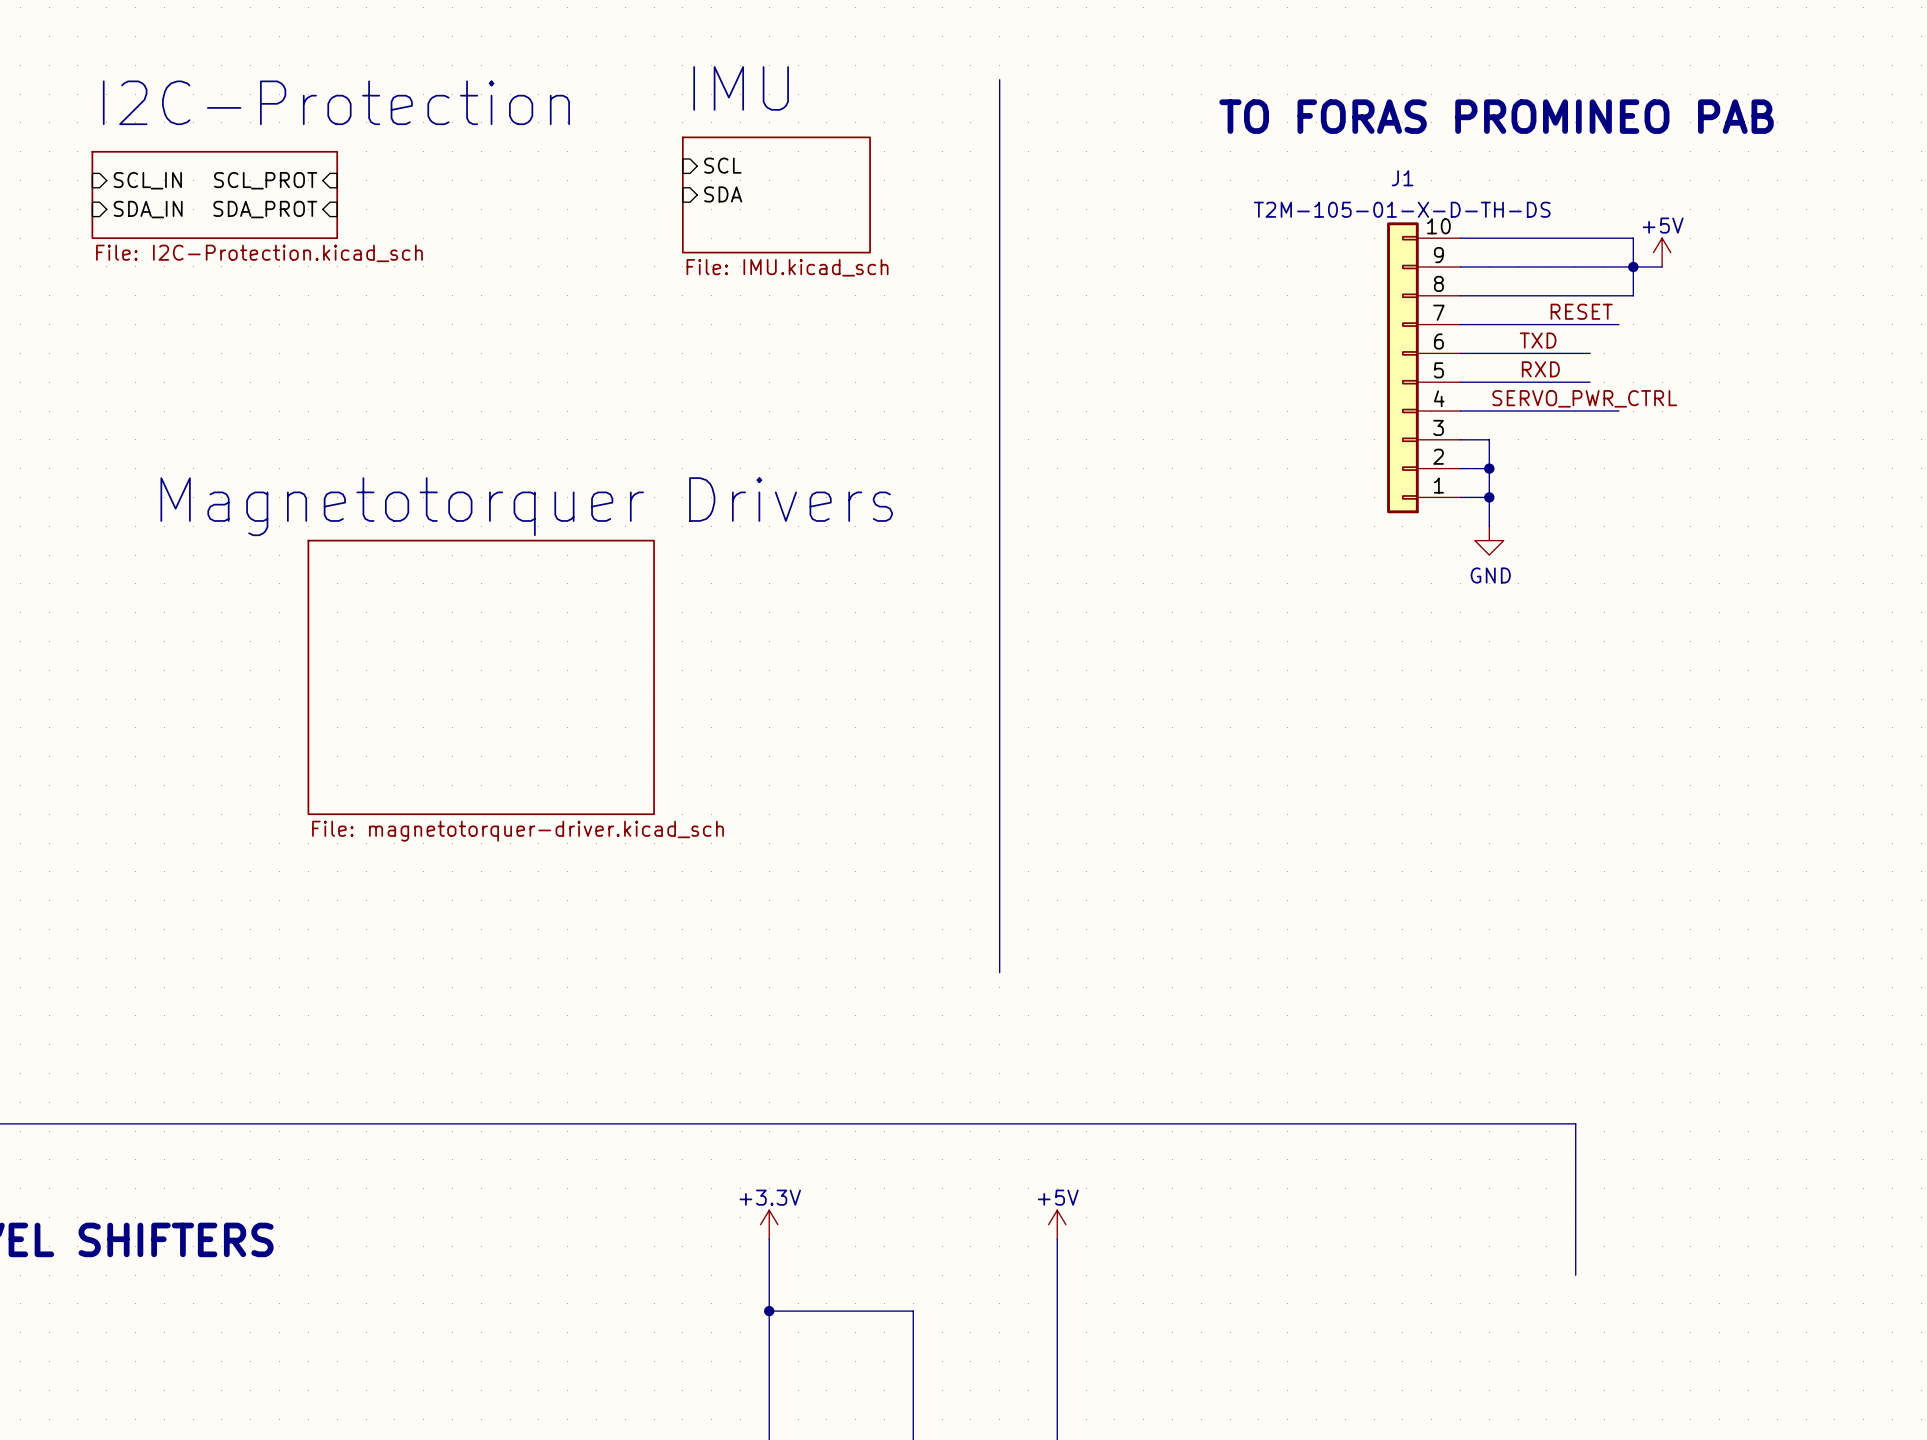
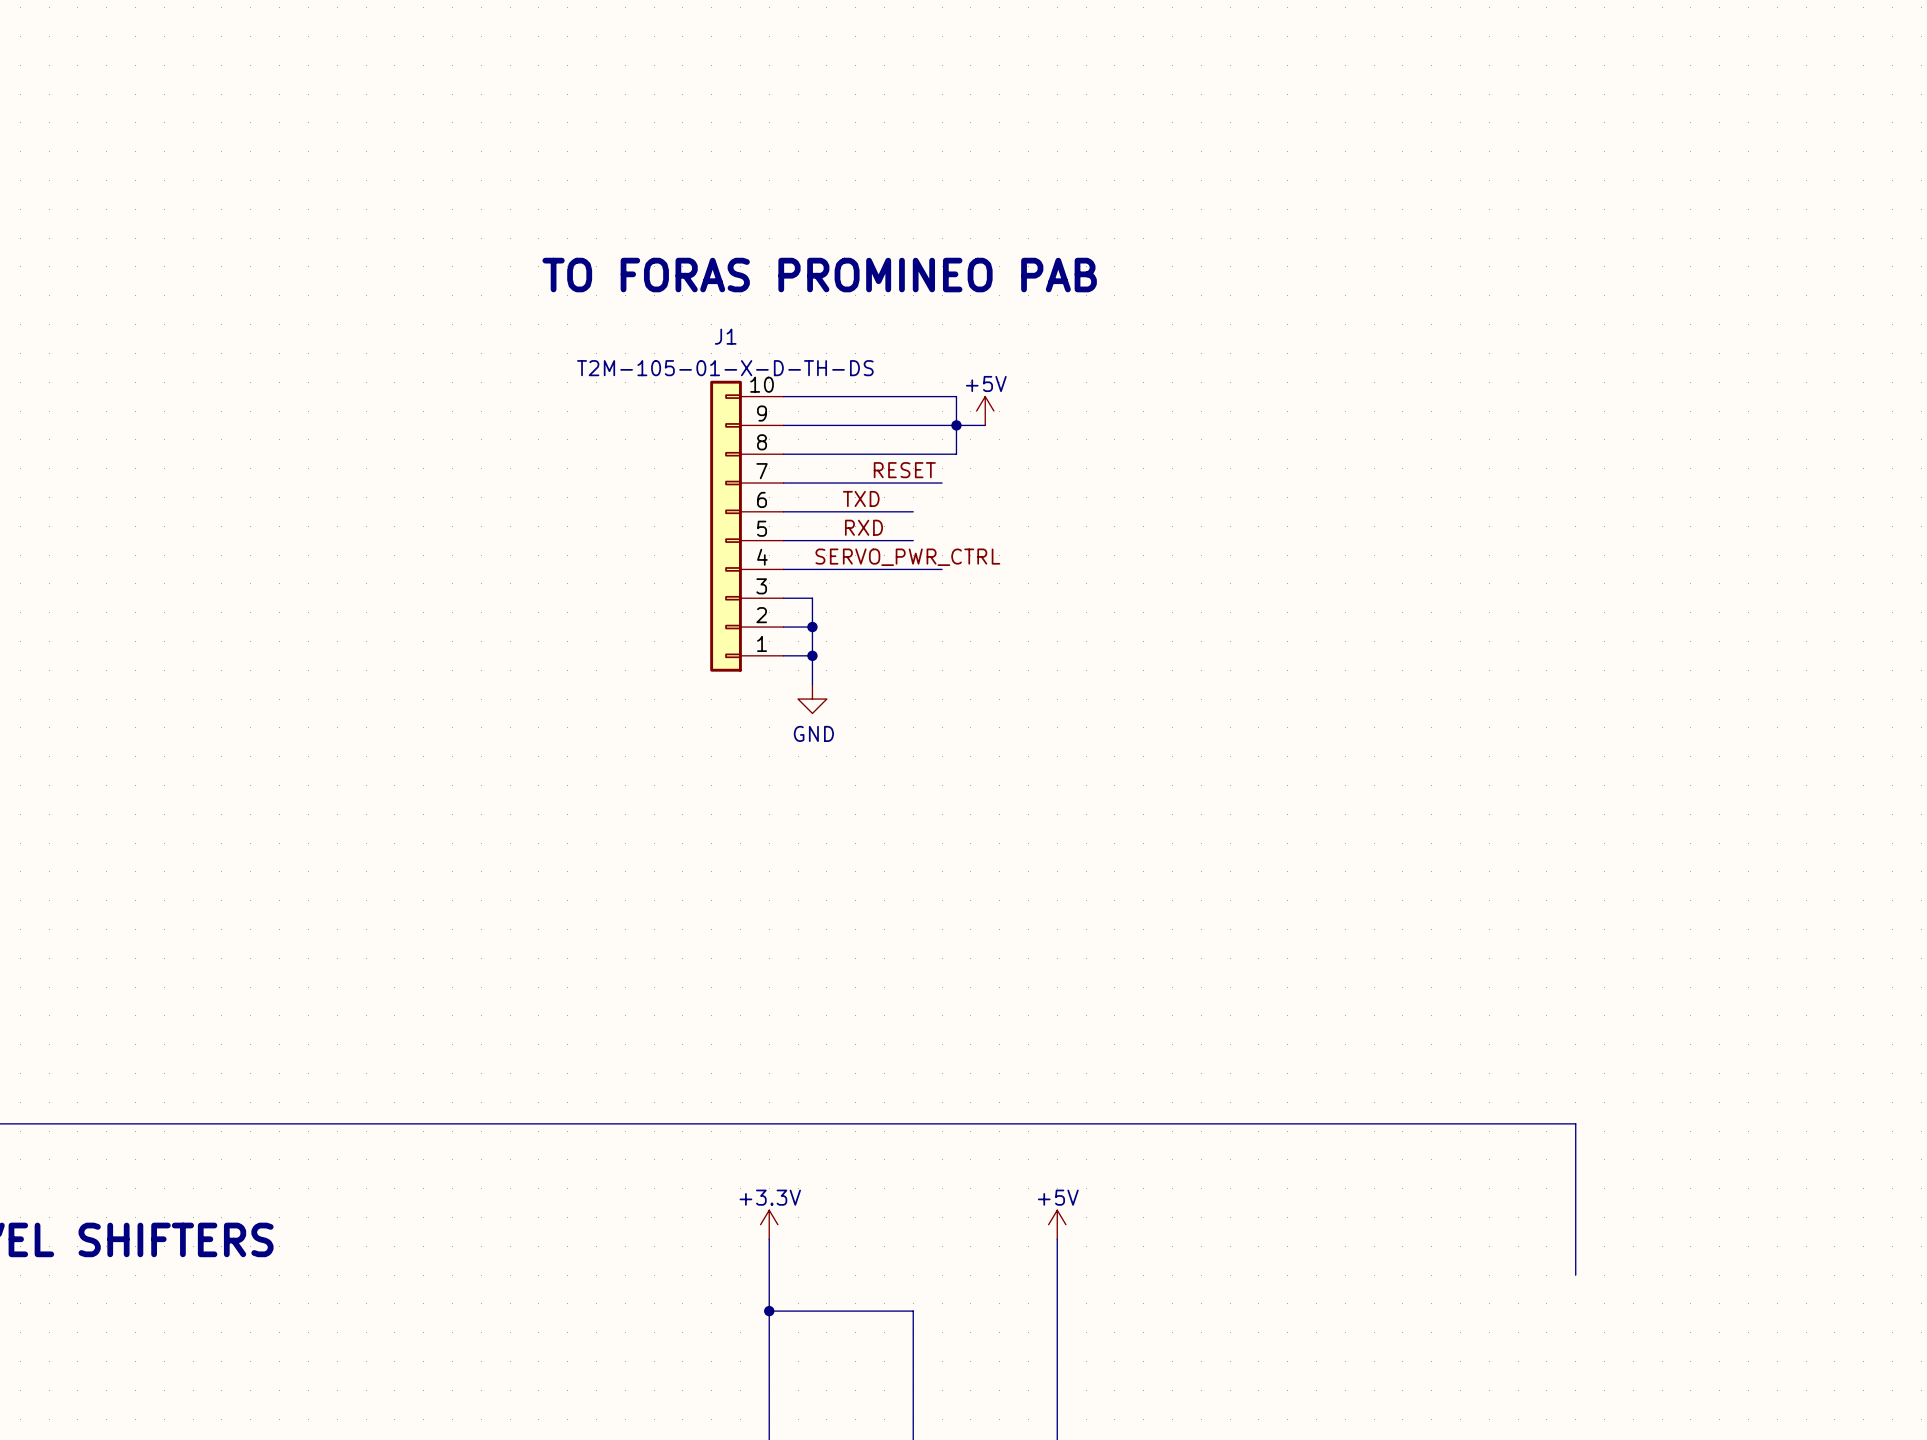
line: (999, 79) (999, 972) -> none
text: TO FORAS PROMINEO PAB (1496, 116) -> none
sheet pin: SCL (722, 165) -> none
sheet pin: SCL_IN (147, 180) -> none
sheet pin: SCL_PROT (265, 180) -> none
sheet I2C-Protection: File: I2C-Protection.kicad_sch (214, 194) -> none
sheet pin: SDA (723, 194) -> none
sheet IMU: File: IMU.kicad_sch (776, 194) -> none
sheet pin: SDA_IN (148, 209) -> none
sheet pin: SDA_PROT (265, 209) -> none
wire: (1460, 238) (1633, 238) (1633, 295) (1460, 295) -> none
power symbol: +5V (1662, 252) -> none
wire: (1460, 266) (1662, 266) -> none
junction: (1633, 266) -> none
text: none -> TO FORAS PROMINEO PAB (819, 275)
label: RESET (1581, 311) -> none
wire: (1460, 324) (1618, 324) -> none
label: TXD (1538, 340) -> none
wire: (1460, 353) (1590, 353) -> none
J1 position: (1423, 367) -> (746, 526)
label: RXD (1540, 369) -> none
wire: (1460, 382) (1590, 382) -> none
wire: none -> (783, 396) (956, 396) (956, 454) (783, 454)
label: SERVO_PWR_CTRL (1584, 398) -> none
power symbol: none -> +5V (985, 411)
wire: (1460, 411) (1618, 411) -> none
wire: none -> (783, 425) (985, 425)
junction: none -> (956, 425)
wire: (1460, 439) (1489, 439) (1489, 526) -> none
wire: (1460, 468) (1489, 468) -> none
junction: (1489, 468) -> none
label: none -> RESET (904, 470)
wire: none -> (783, 483) (942, 483)
wire: (1460, 497) (1489, 497) -> none
junction: (1489, 497) -> none
label: none -> TXD (861, 498)
wire: none -> (783, 511) (913, 511)
label: none -> RXD (863, 527)
wire: none -> (783, 540) (913, 540)
power symbol: GND (1489, 540) -> none
label: none -> SERVO_PWR_CTRL (907, 557)
wire: none -> (783, 569) (942, 569)
wire: none -> (783, 598) (812, 598) (812, 684)
wire: none -> (783, 627) (812, 627)
junction: none -> (812, 627)
wire: none -> (783, 655) (812, 655)
junction: none -> (812, 655)
sheet Magnetotorquer Drivers: File: magnetotorquer-driver.kicad_sch (481, 677) -> none
power symbol: none -> GND (812, 699)

